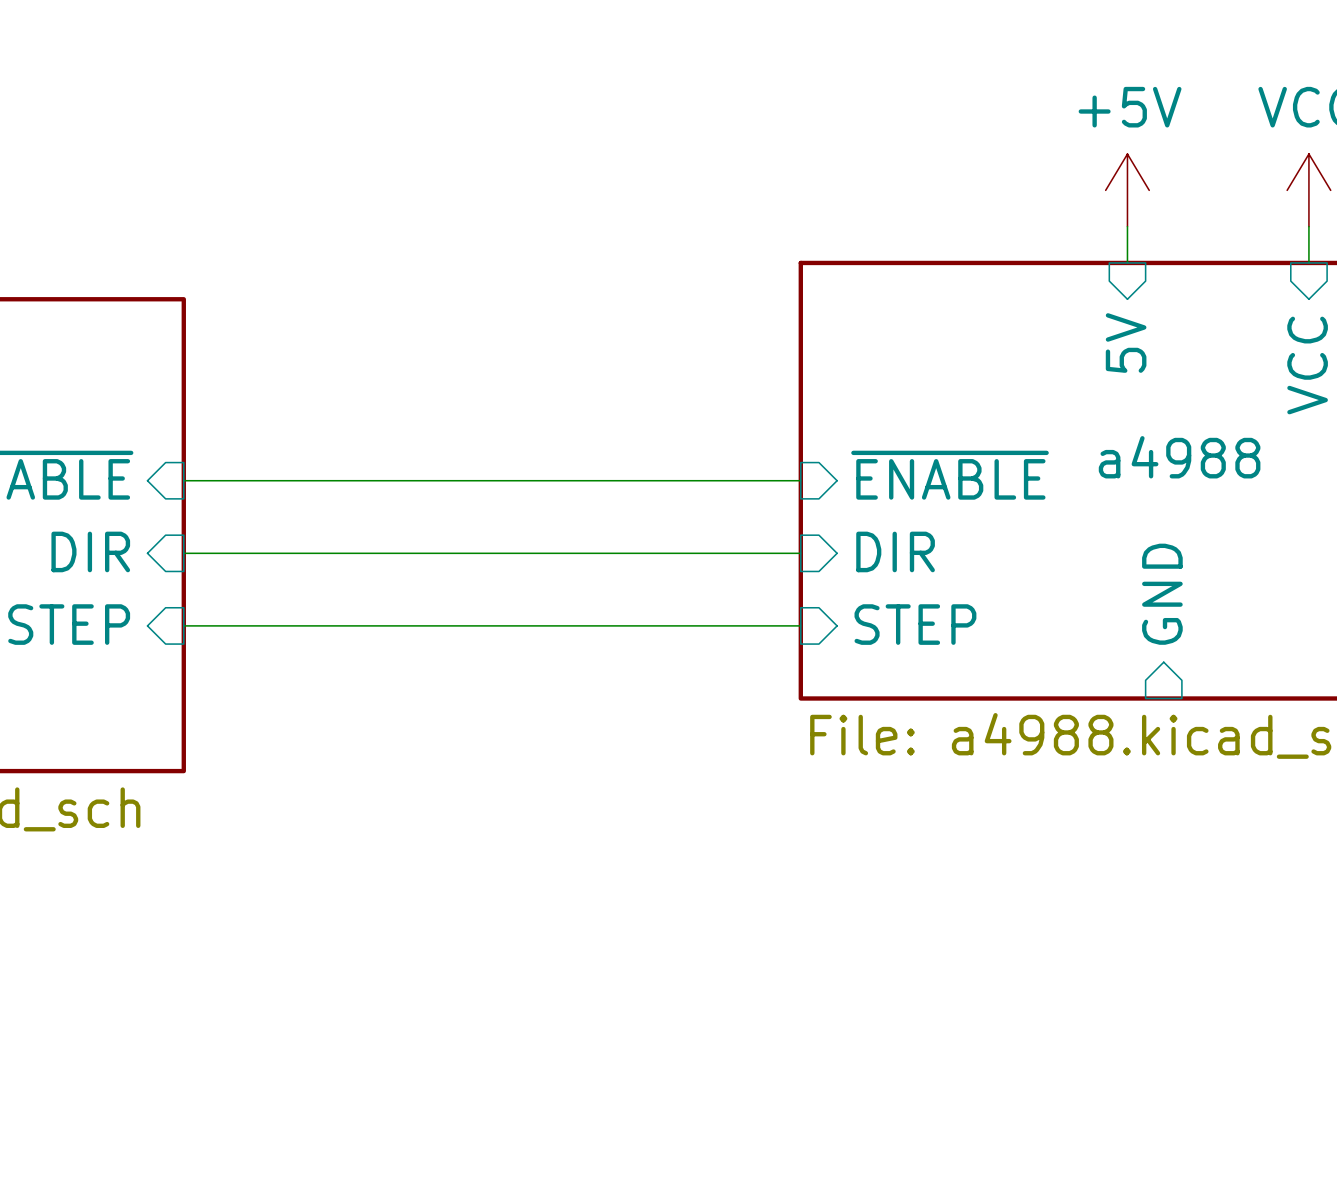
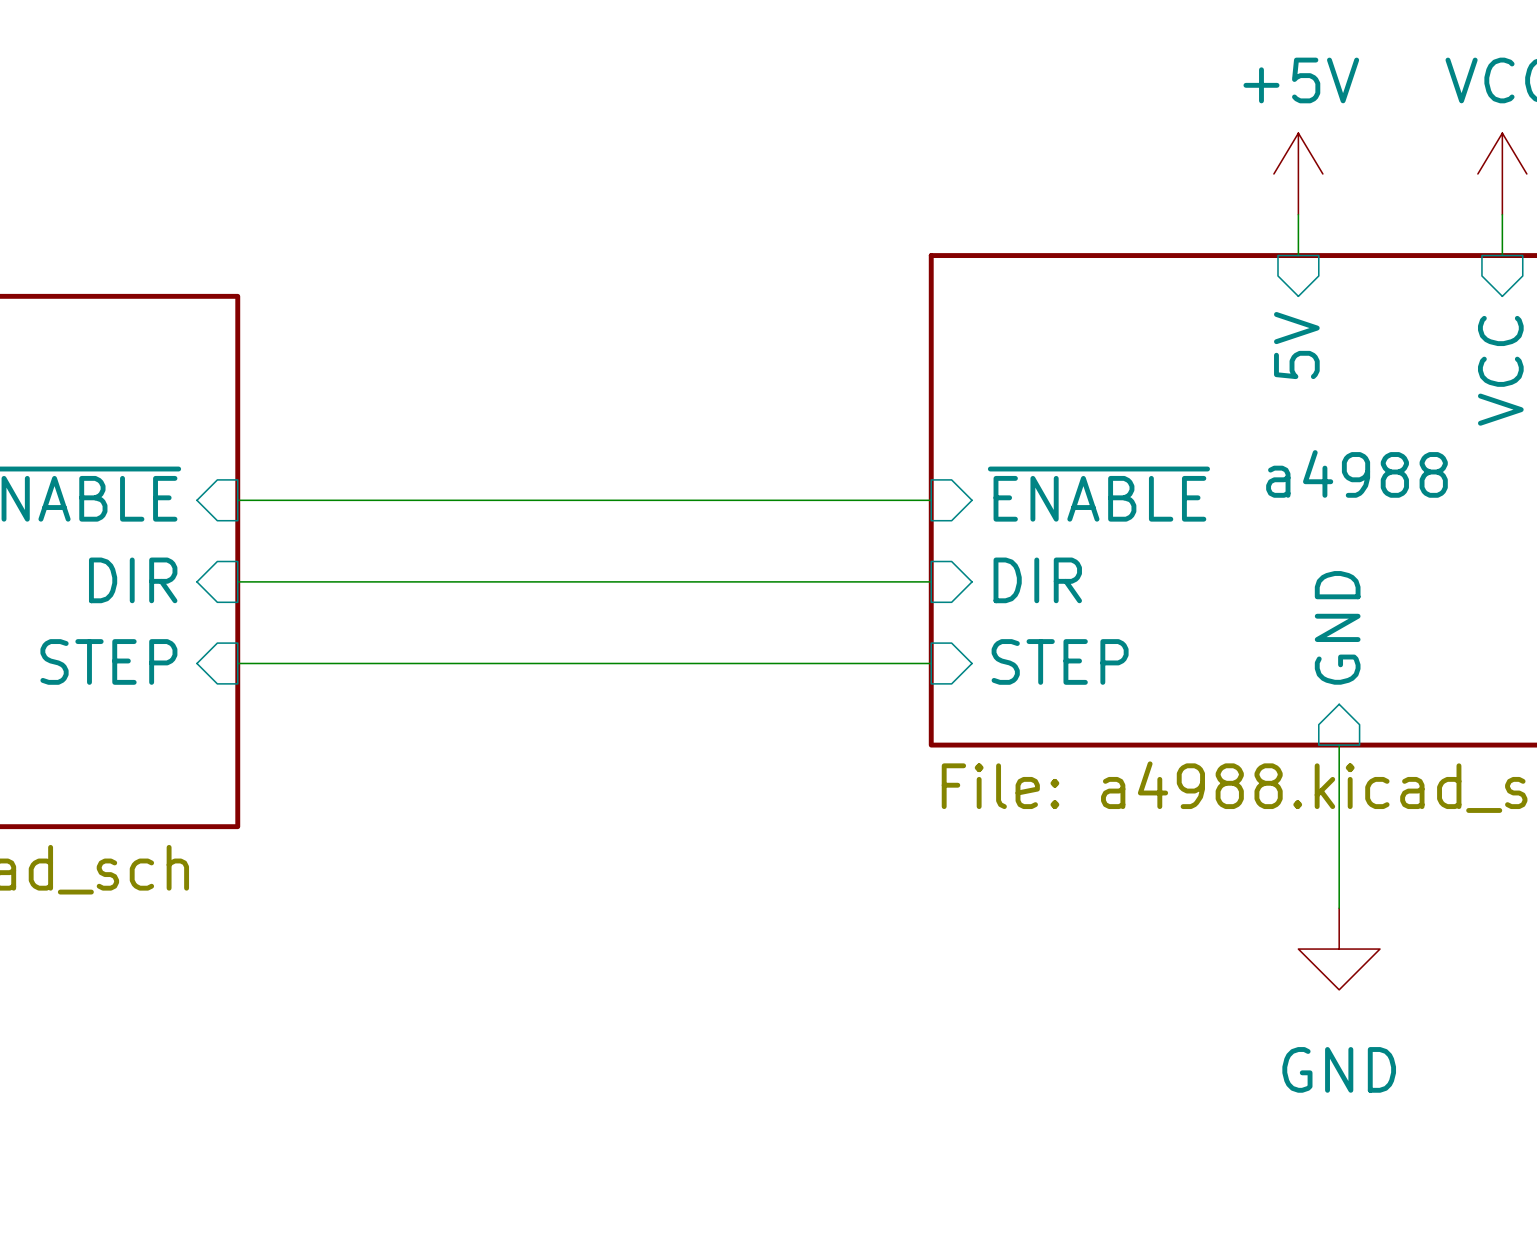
wire: none -> (1339, 745) (1339, 908)
power symbol: none -> GND (1339, 949)

